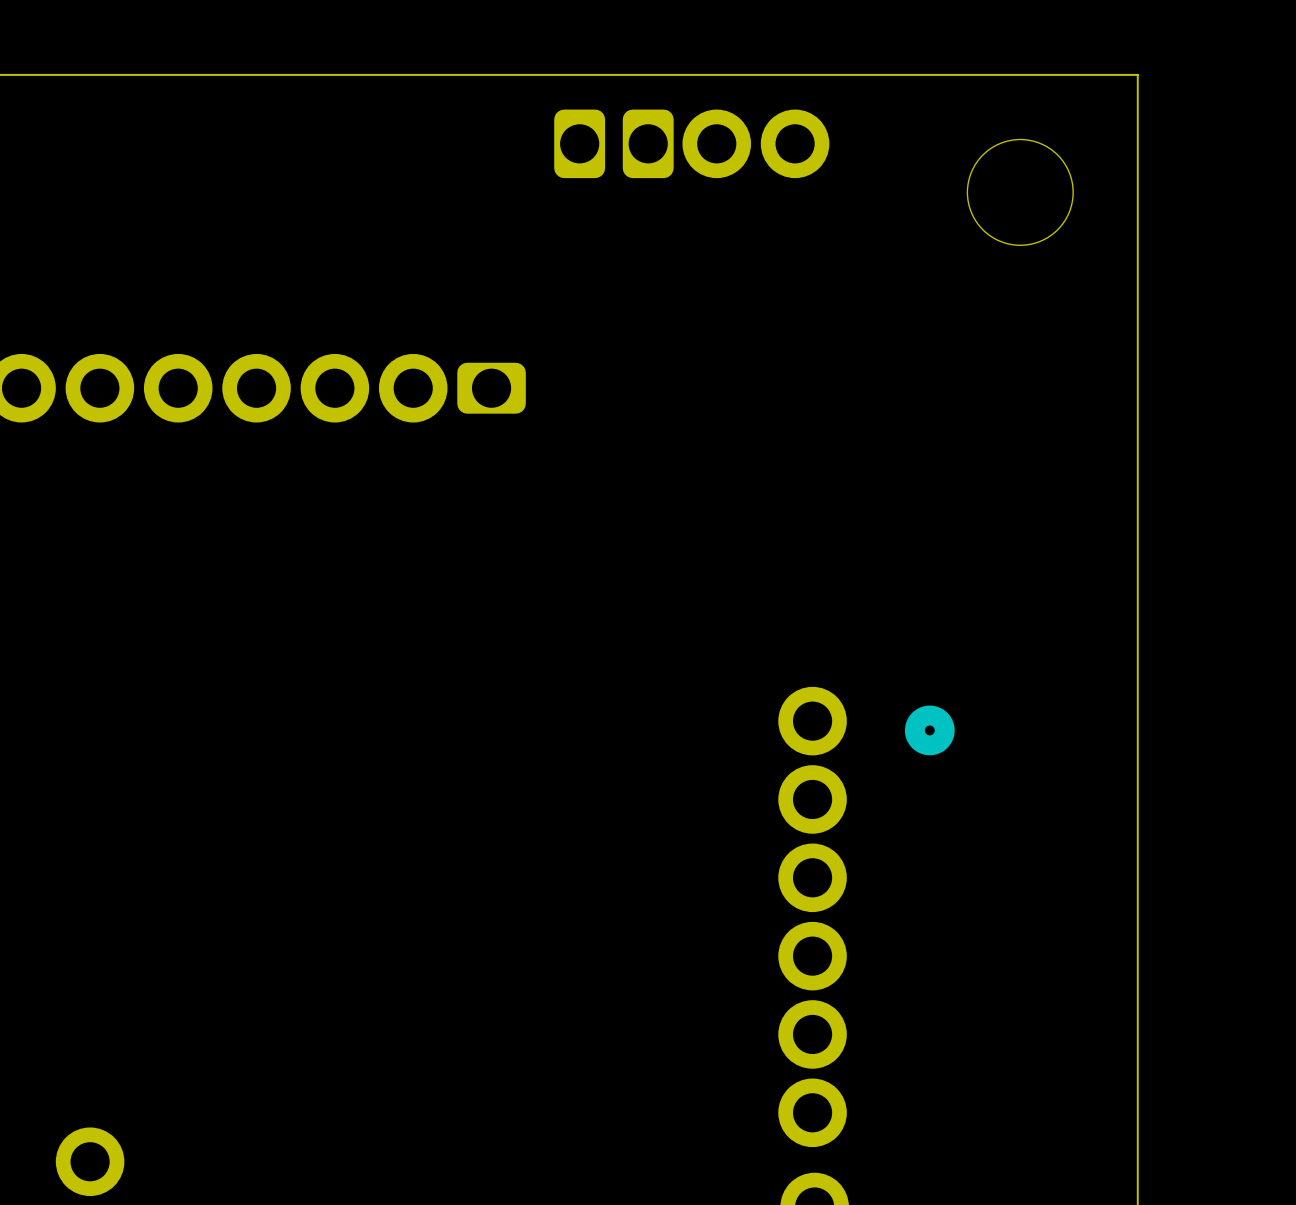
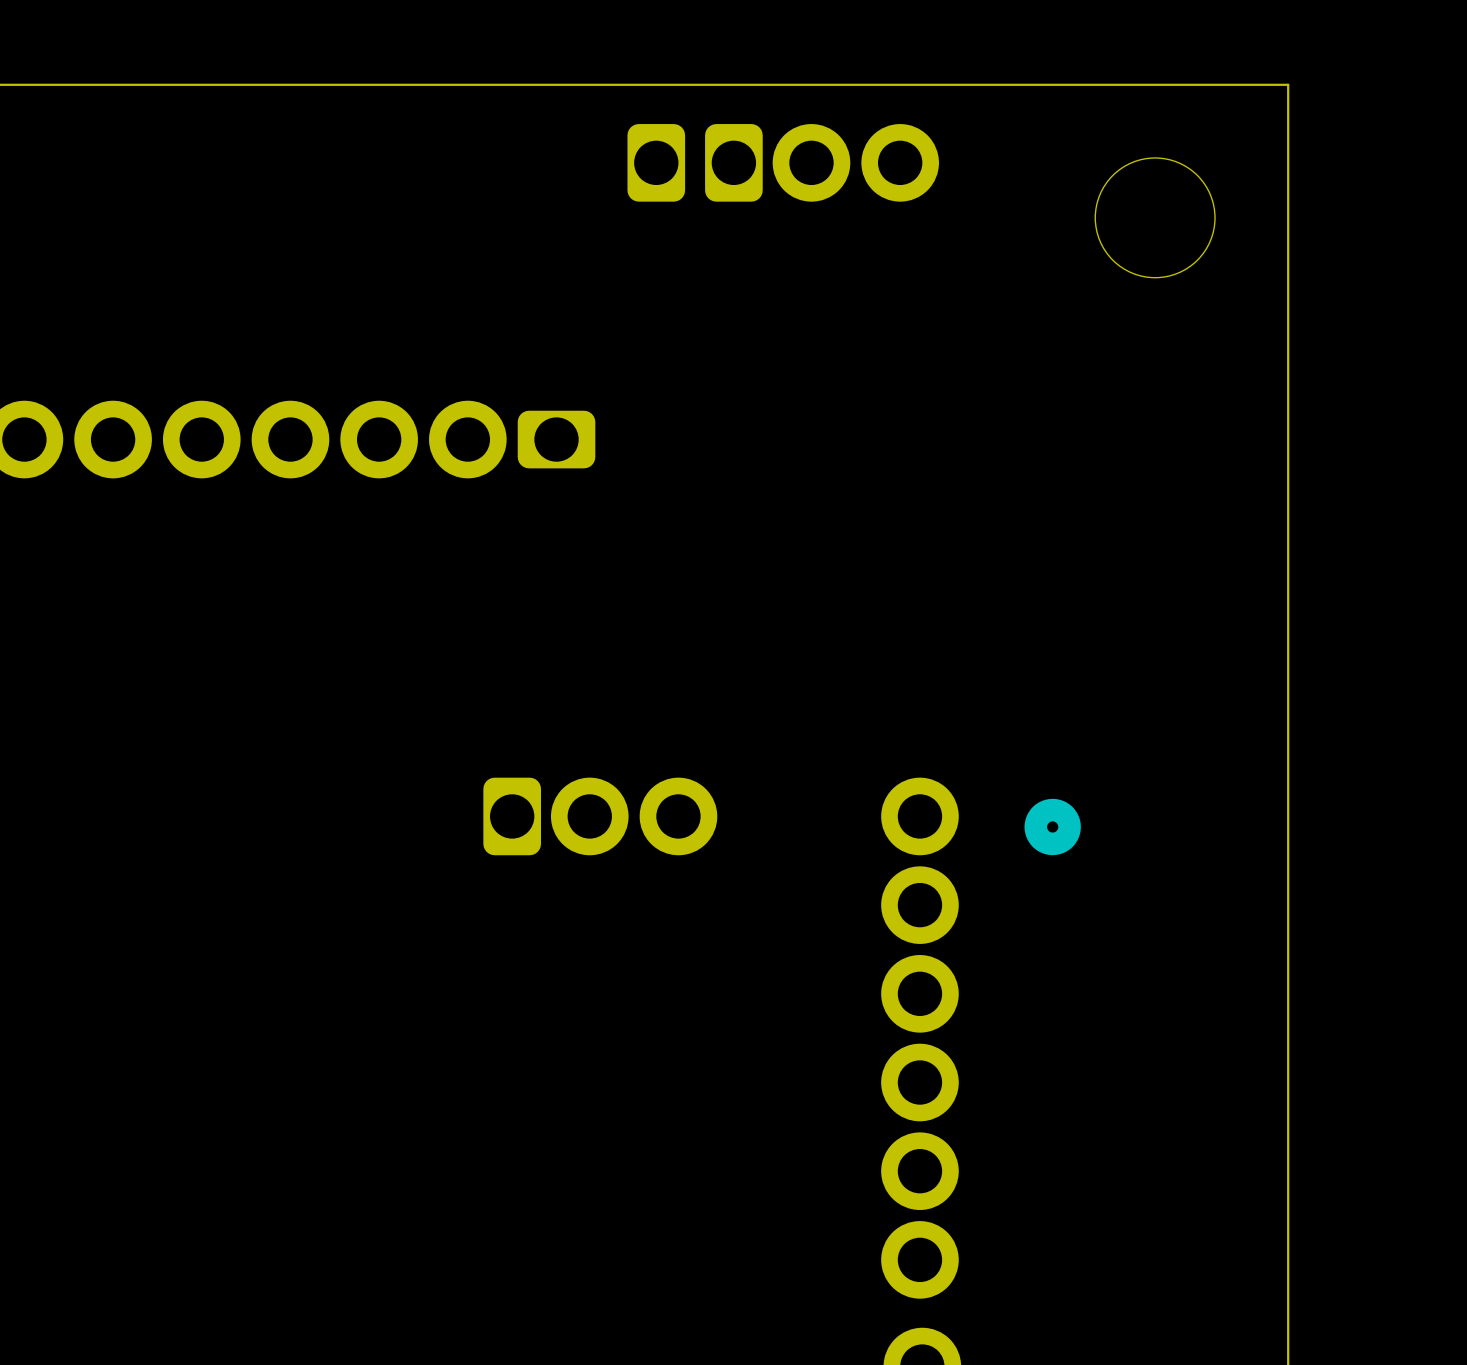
part: none -> (512, 816)
part: none -> (589, 816)
part: none -> (678, 816)
part: (90, 1161) -> none

